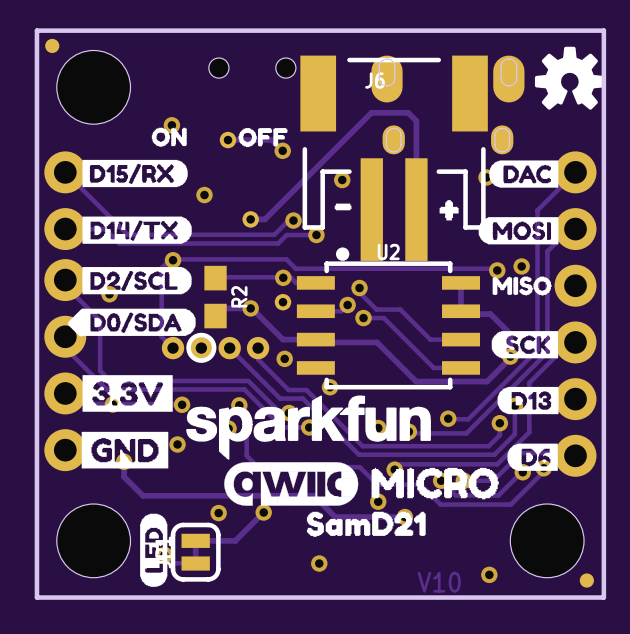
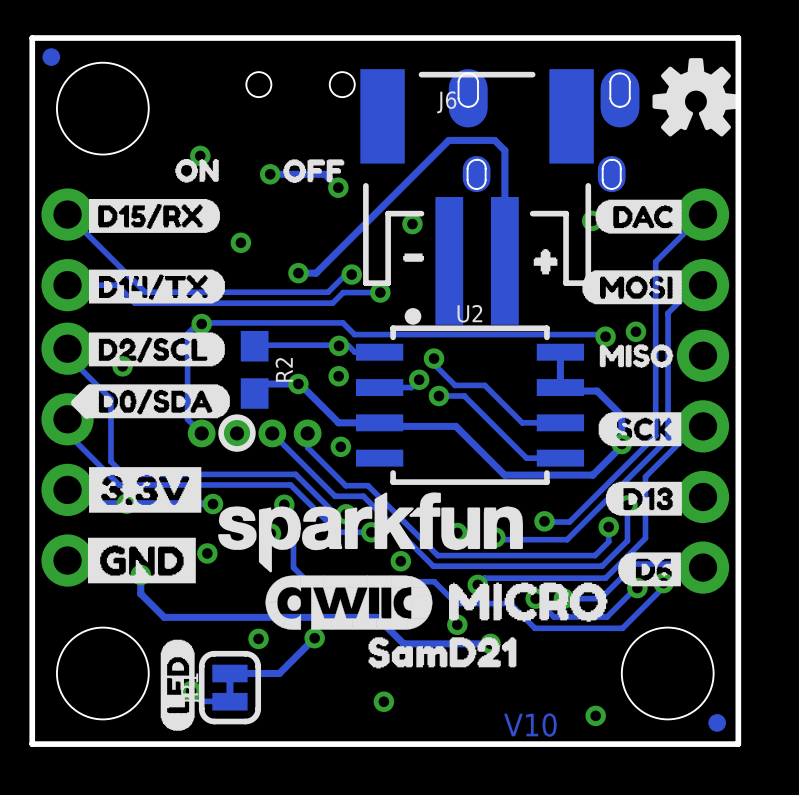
via position: (330, 387) -> (400, 561)

